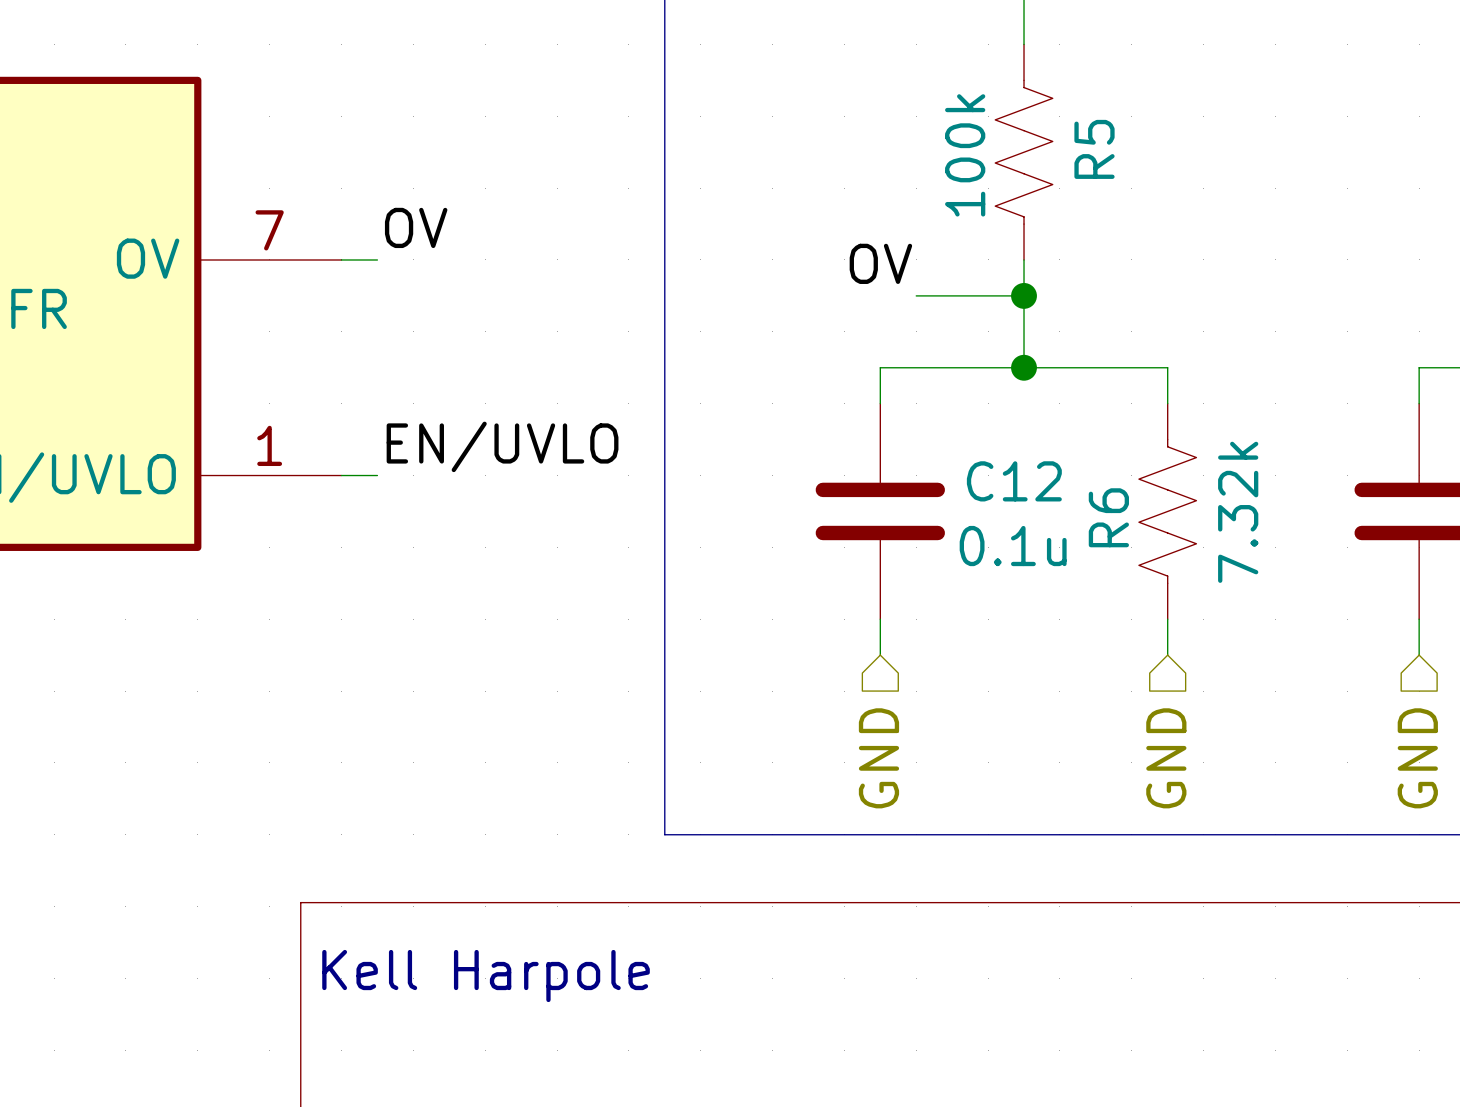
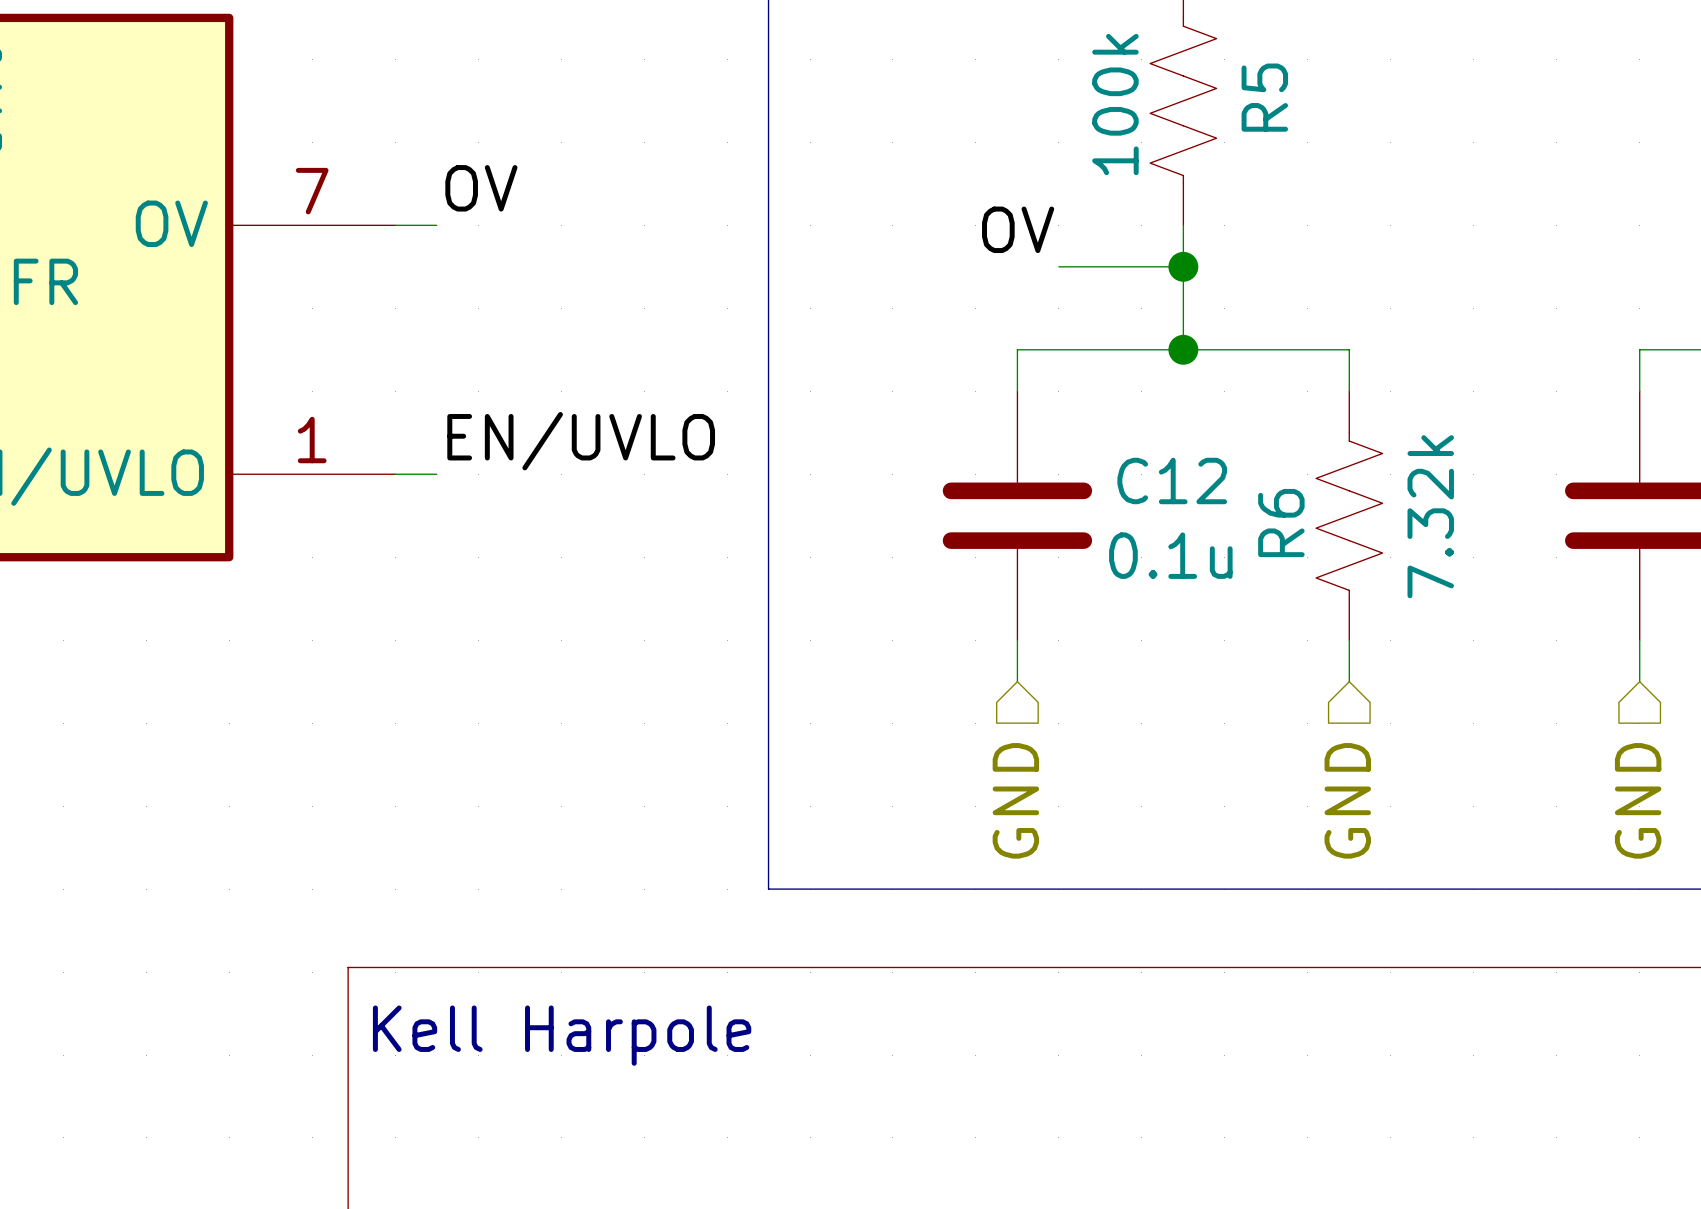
text position: Kell Harpole (486, 976) -> Kell Harpole (562, 1035)

